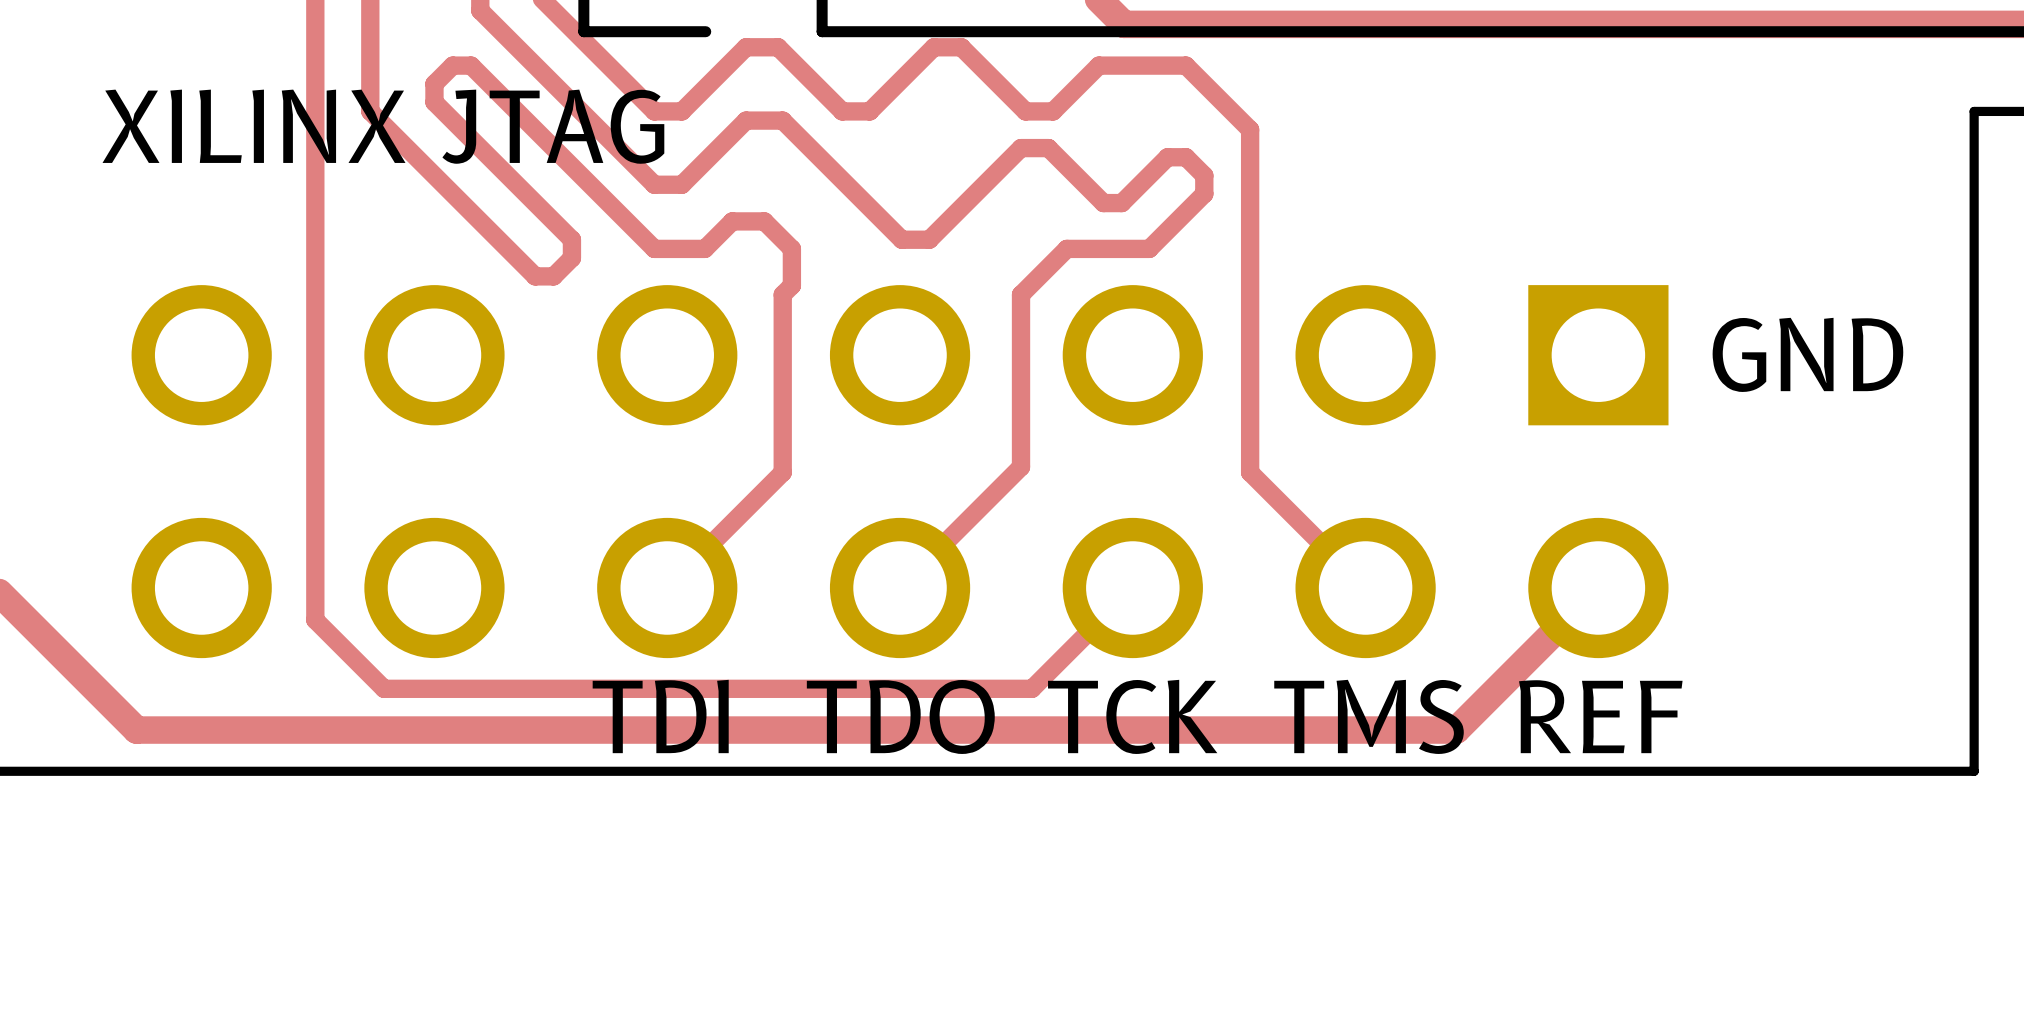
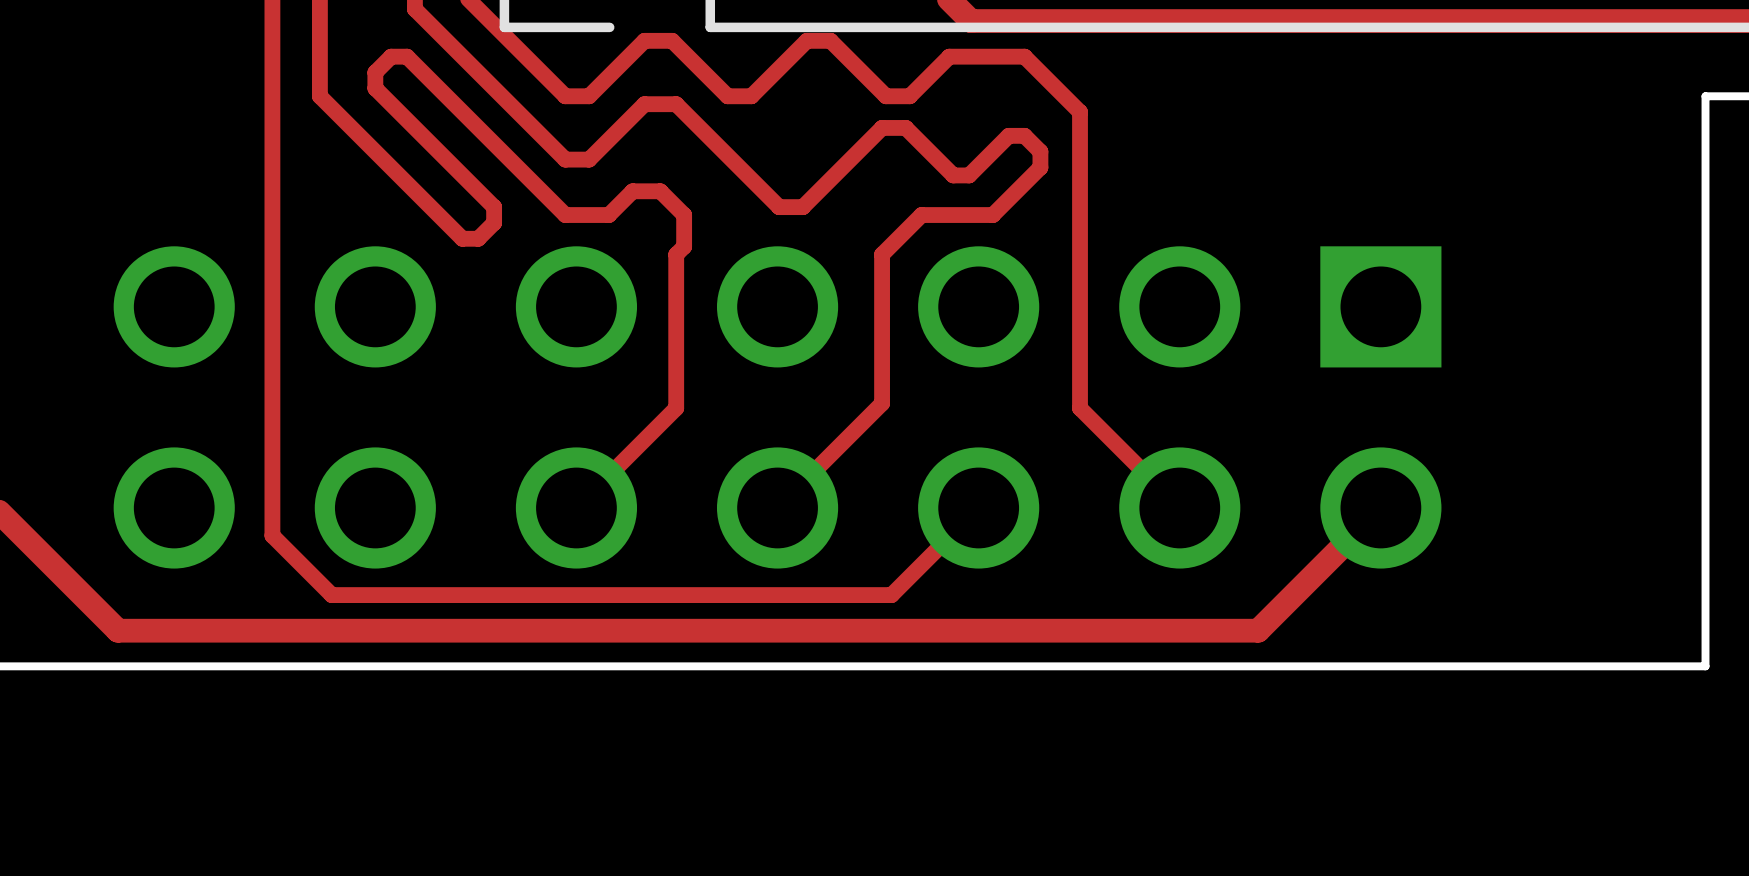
text: XILINX JTAG (383, 126) -> none
text: GND (1807, 354) -> none
text: TDI (660, 716) -> none
text: TDO (900, 716) -> none
text: TCK (1132, 716) -> none
text: TMS (1369, 716) -> none
text: REF (1600, 716) -> none

